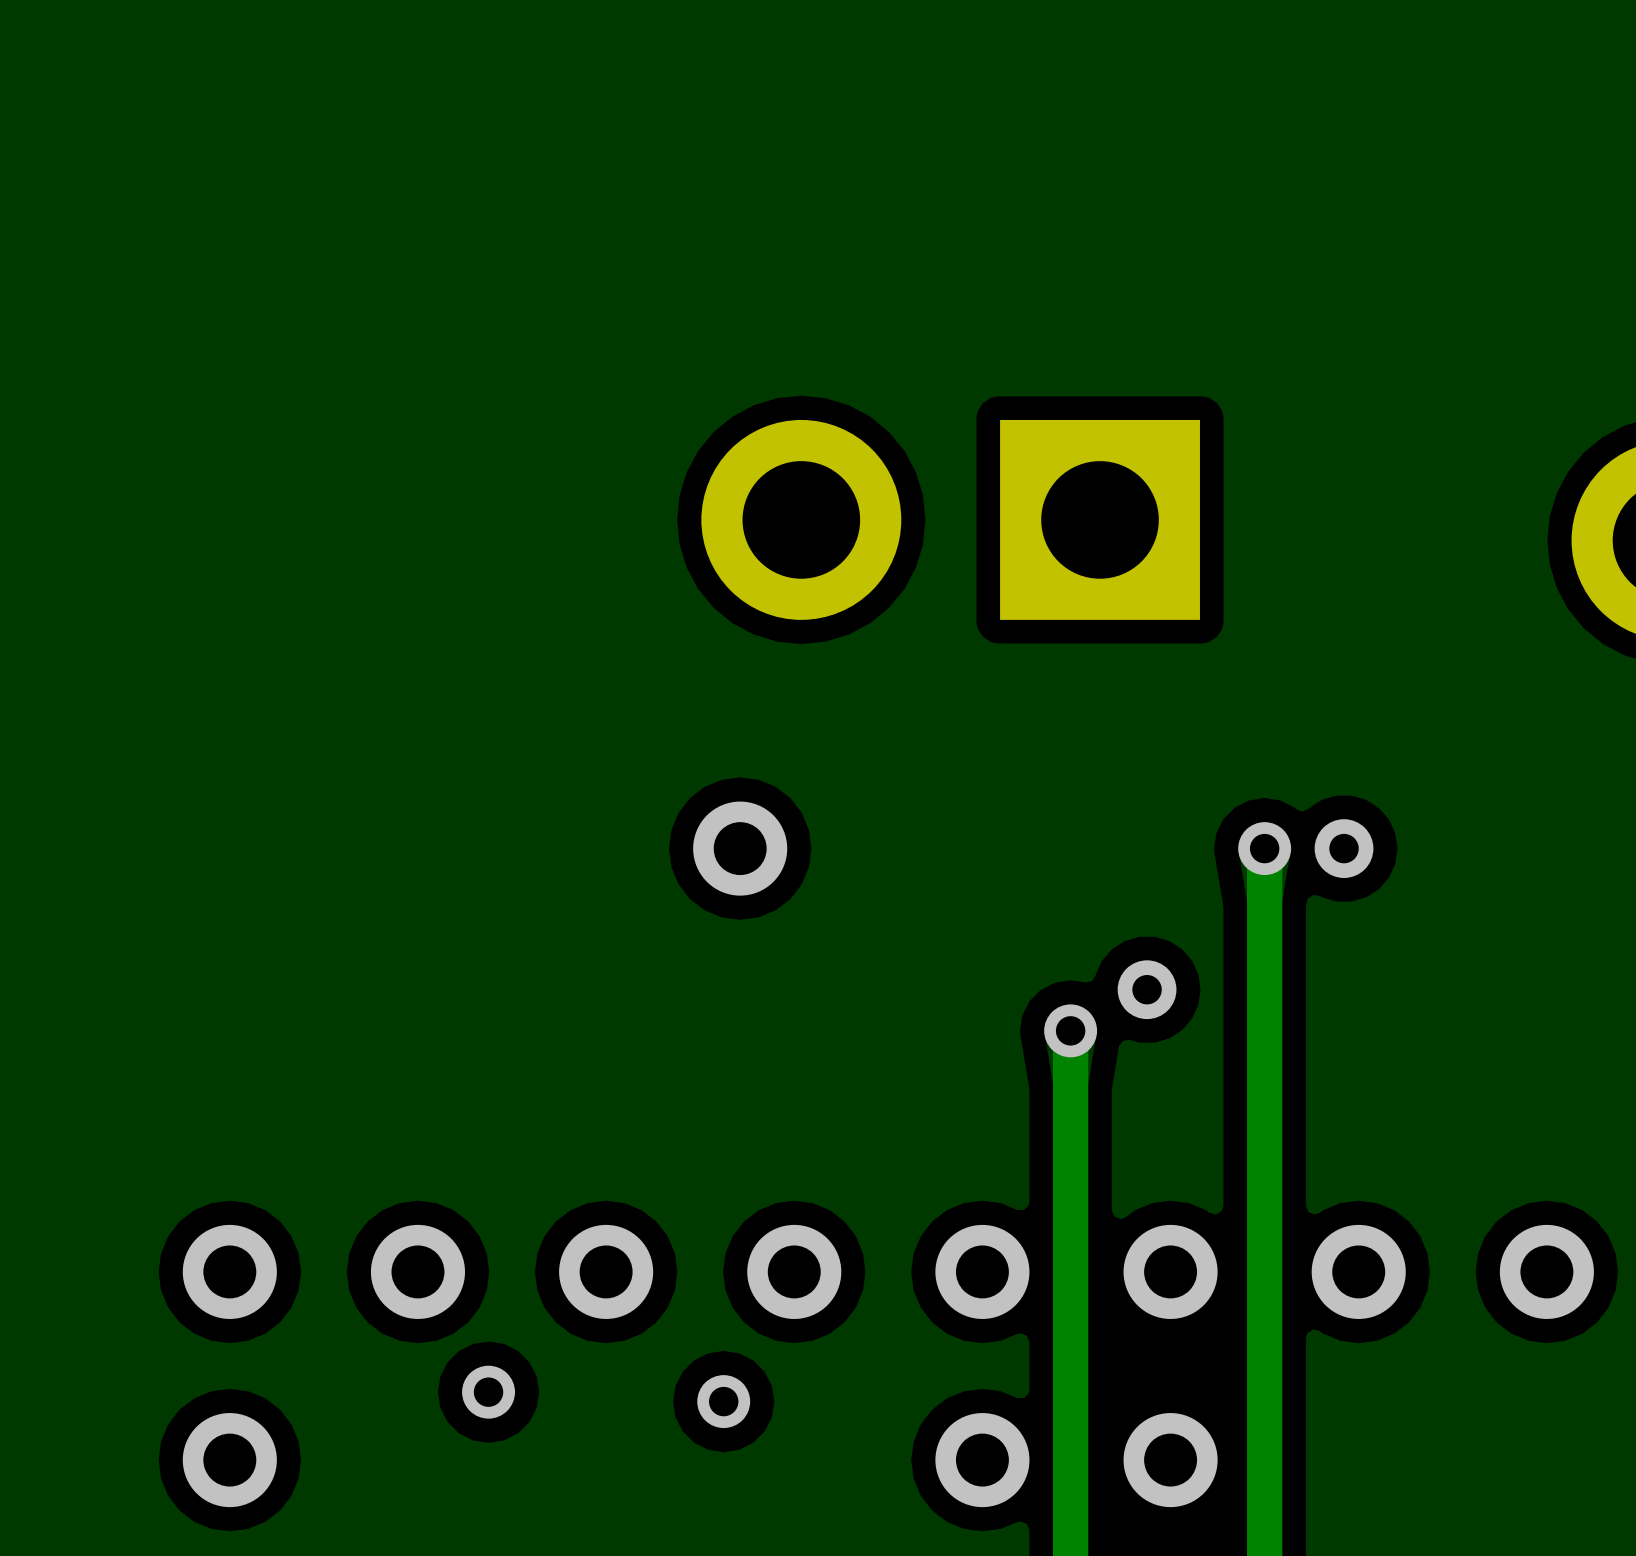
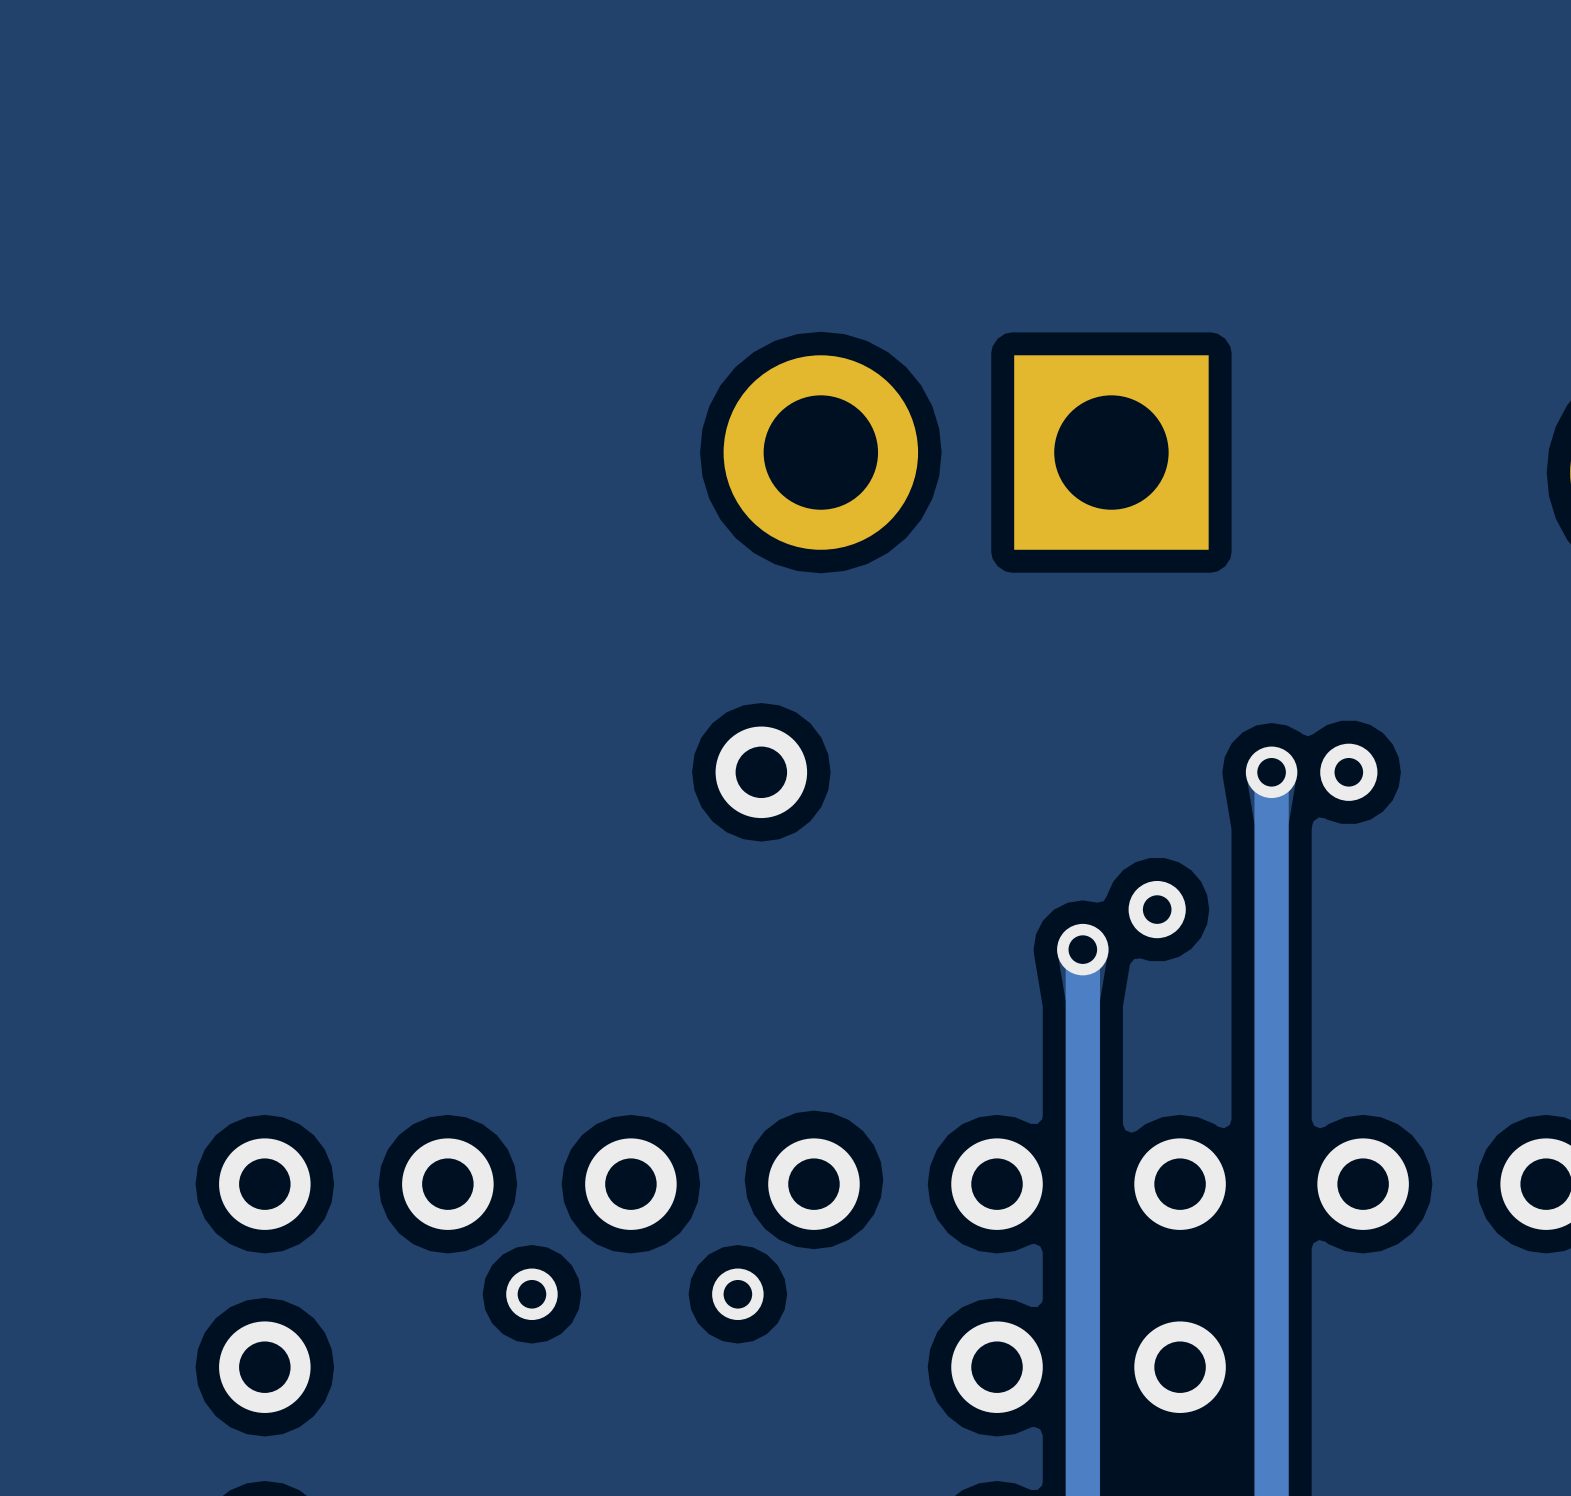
via position: (488, 1392) -> (531, 1294)
via position: (723, 1401) -> (737, 1294)

